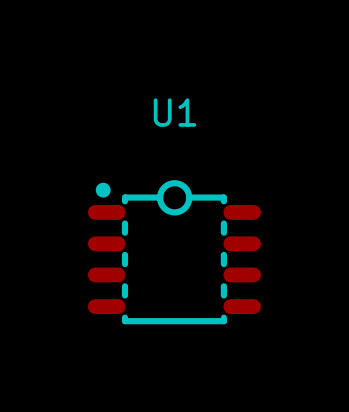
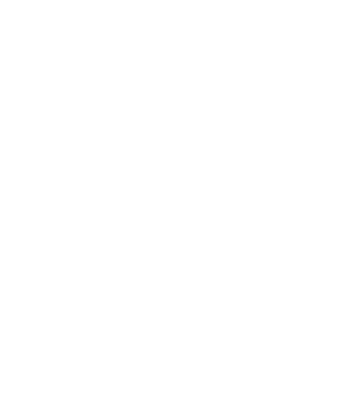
U1: (174, 252) -> none

